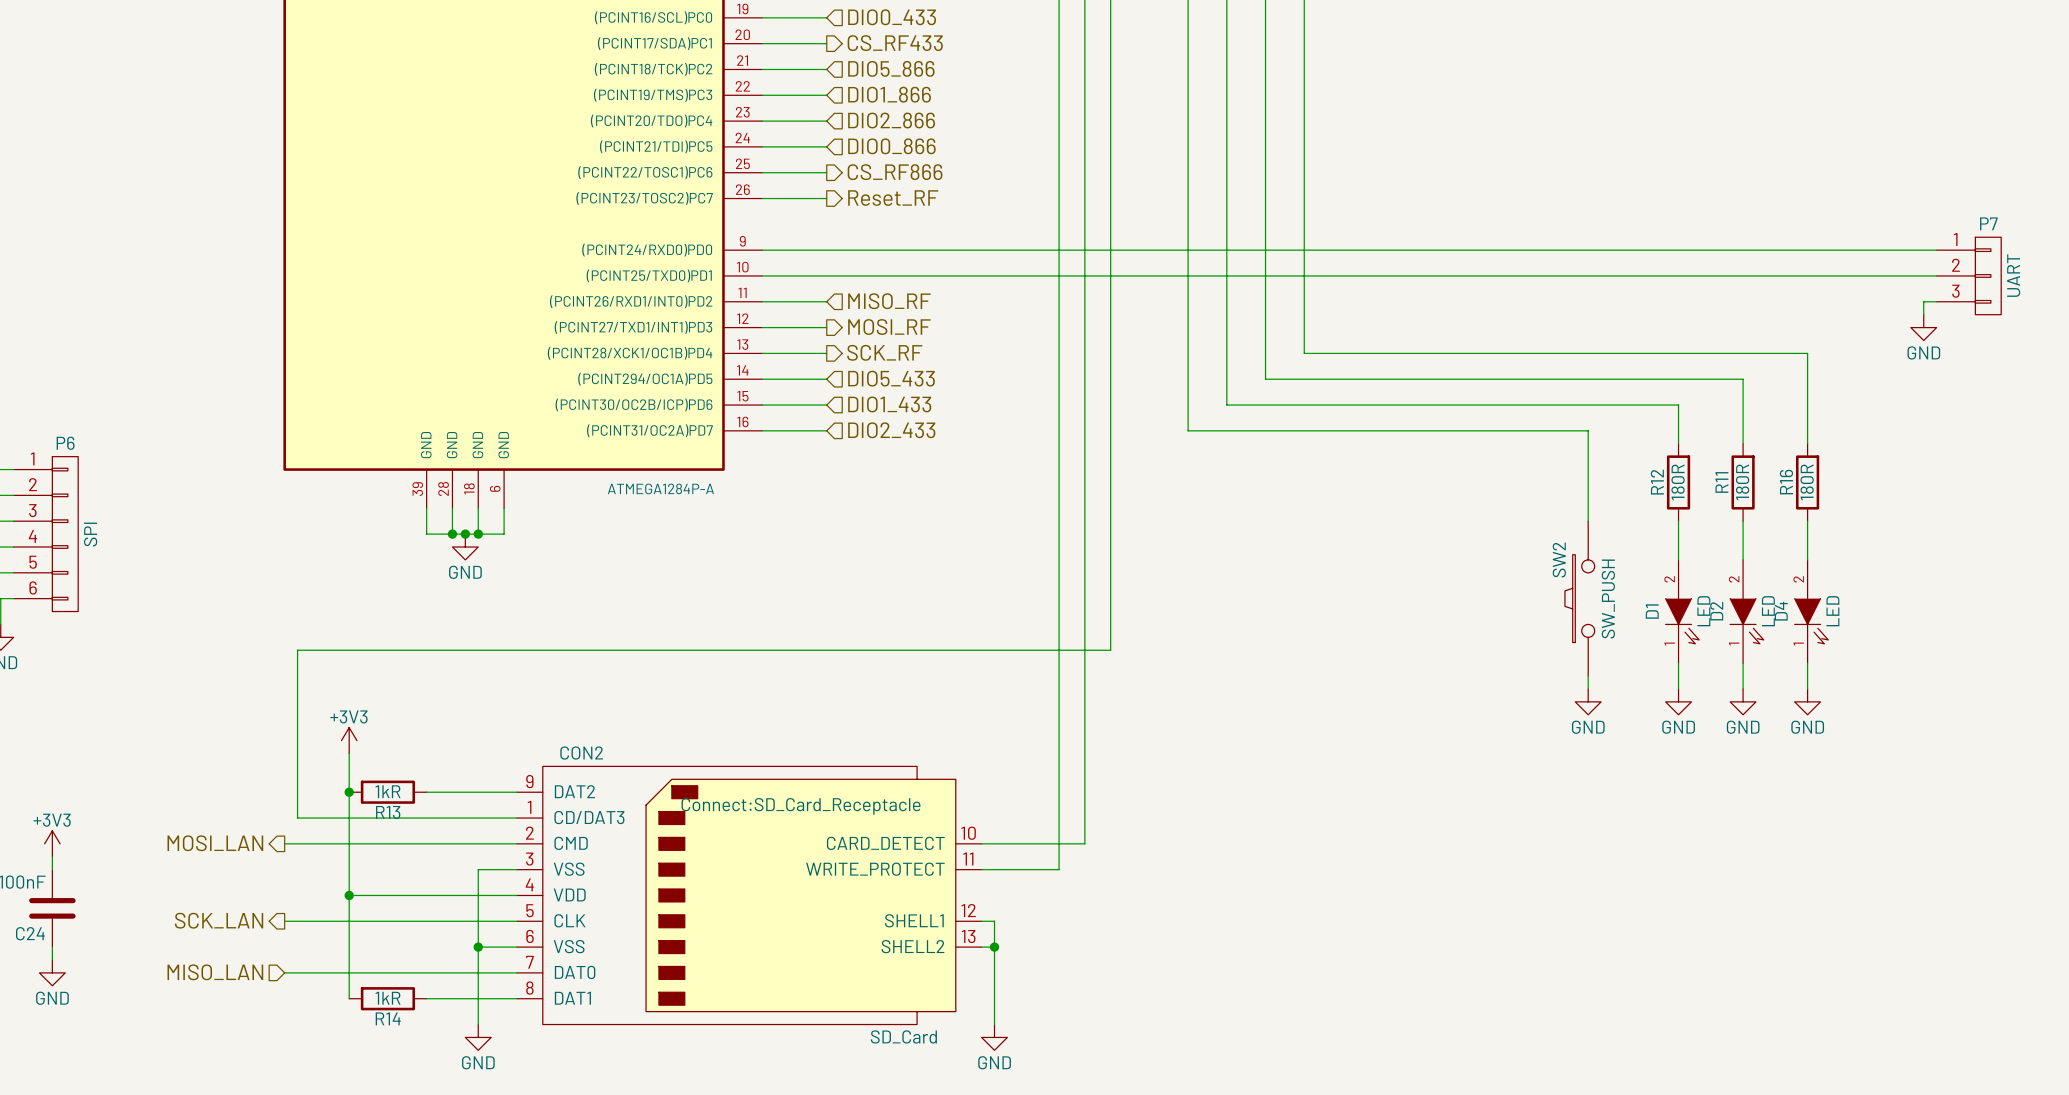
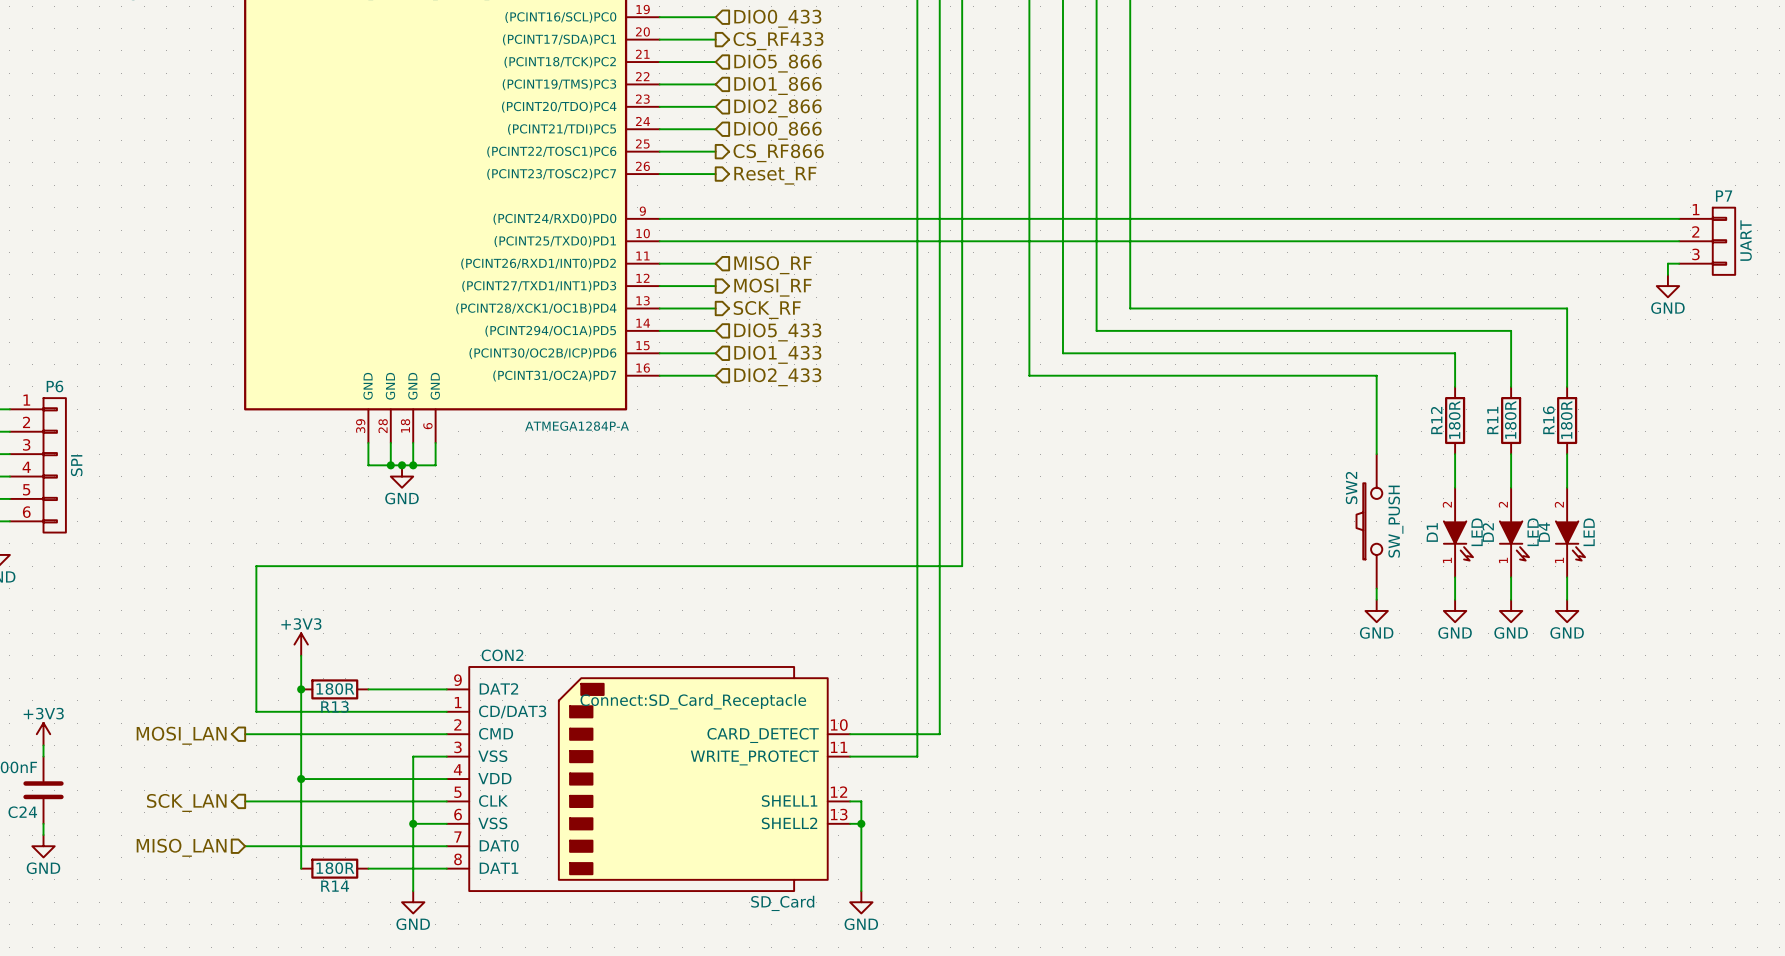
R13 value: 1kR (388, 791) -> 180R (335, 688)
R14 value: 1kR (388, 998) -> 180R (335, 868)

